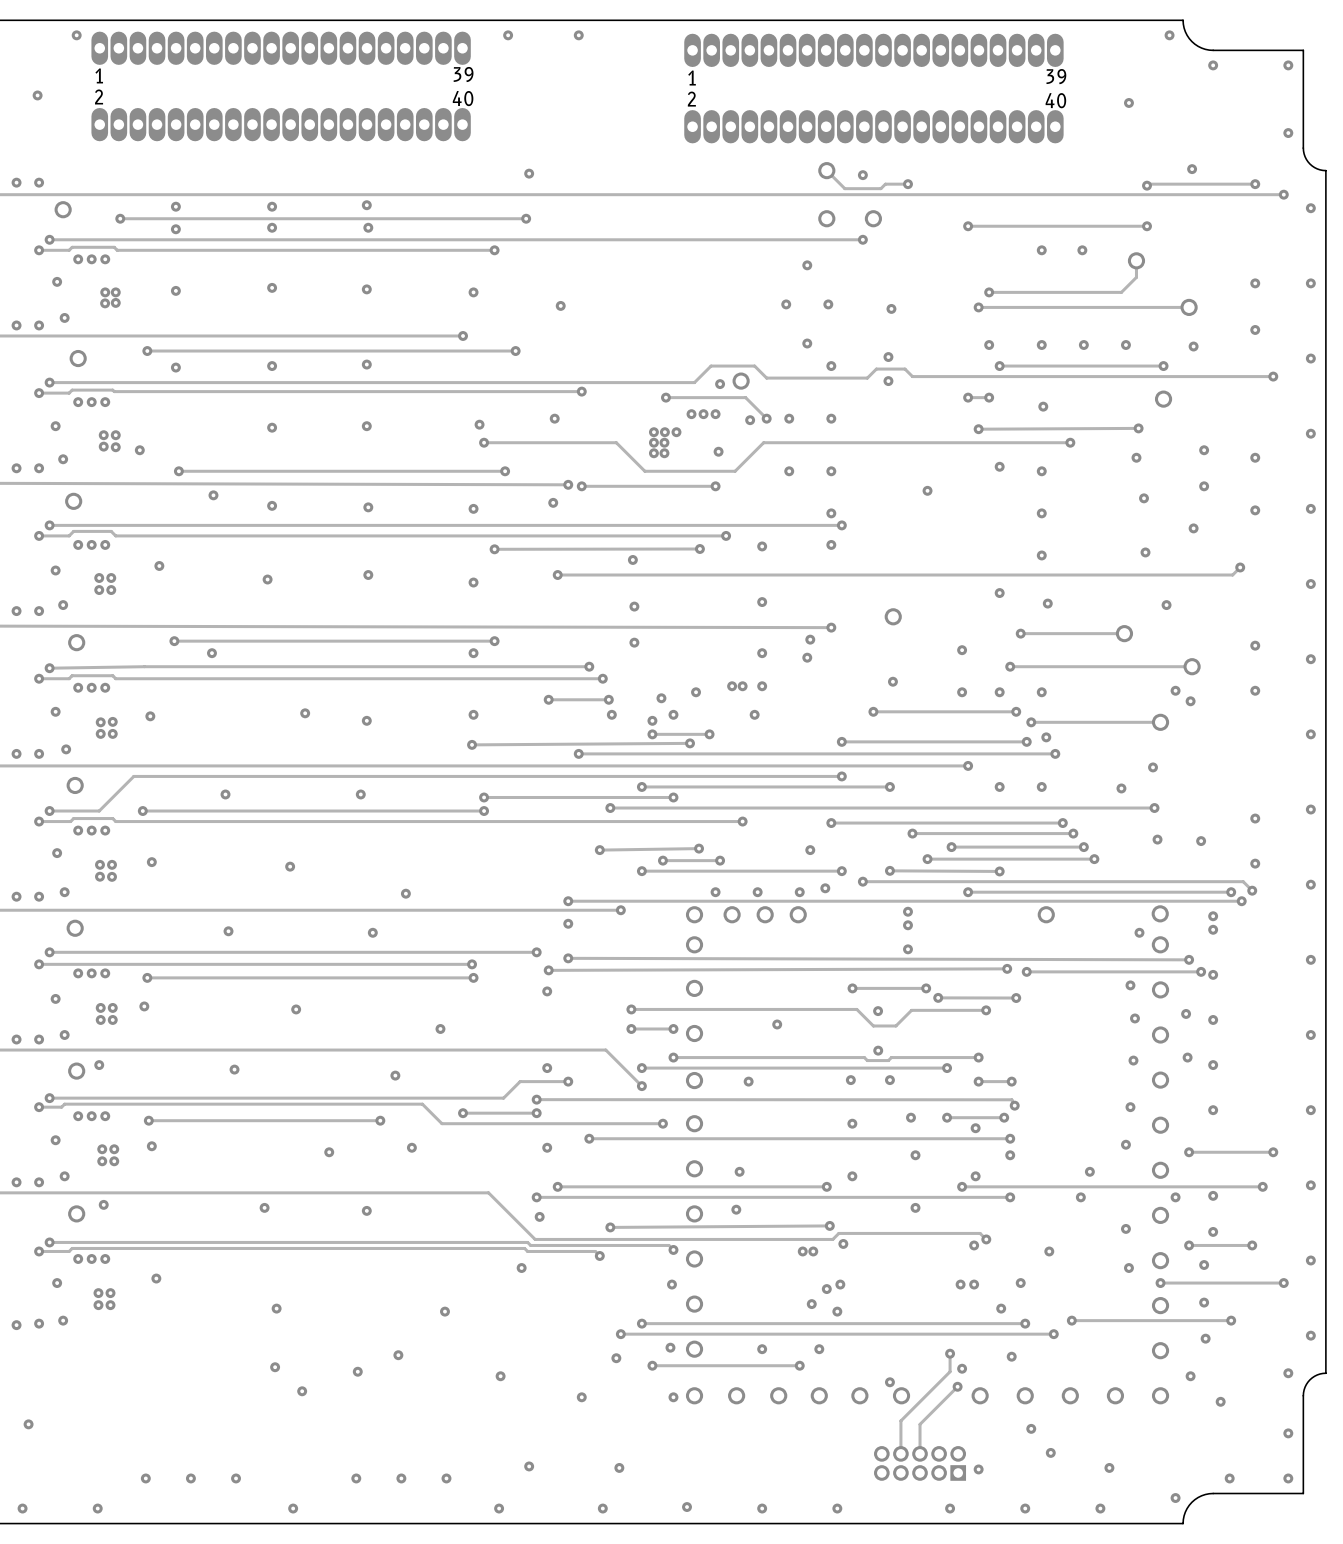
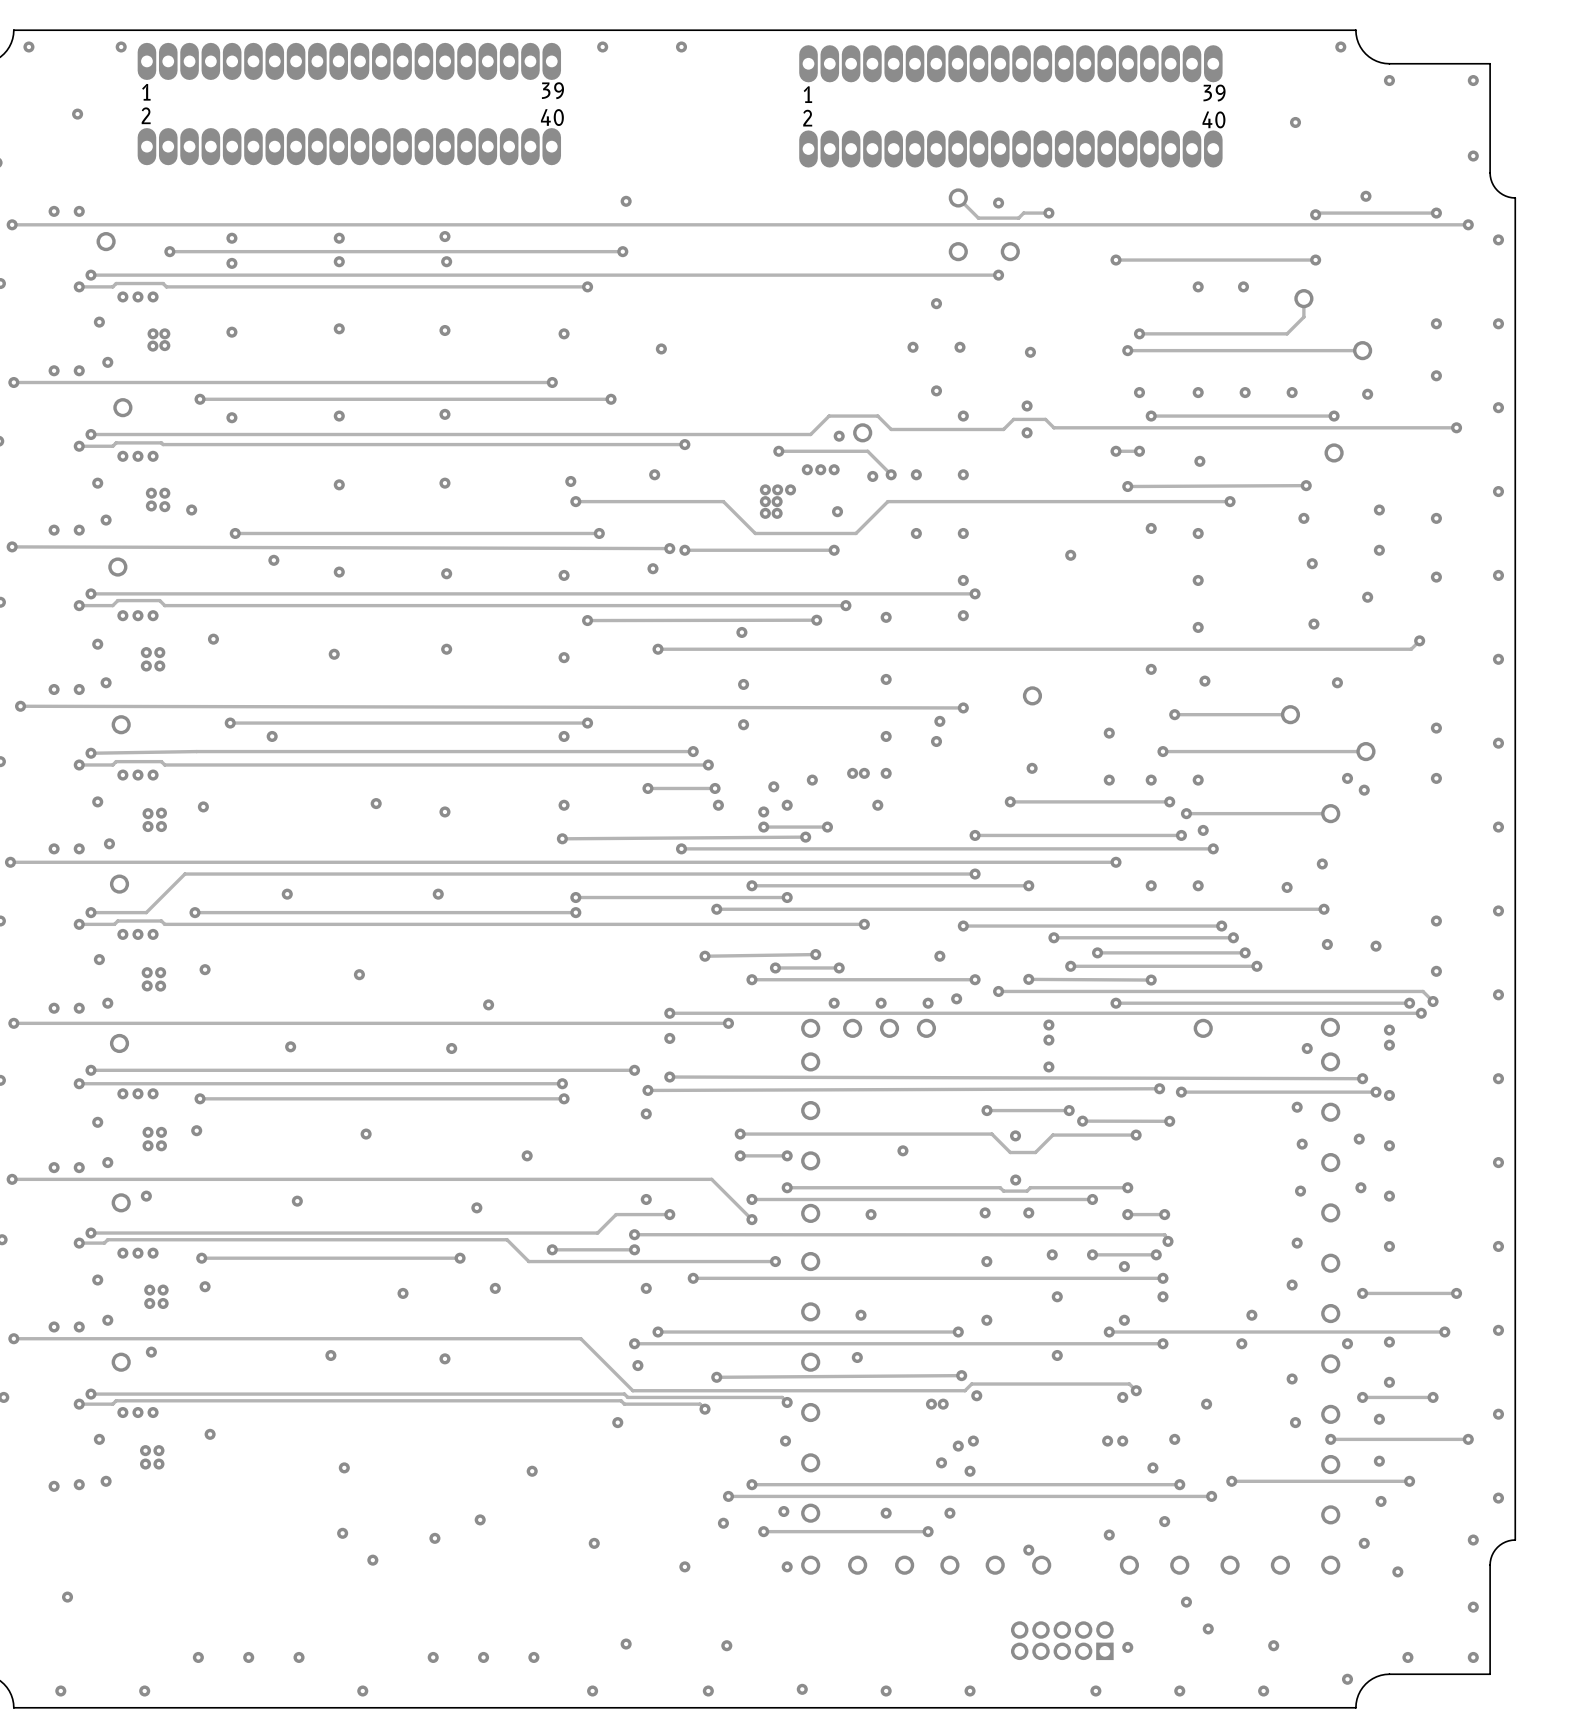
track: (950, 1353) (950, 1371) (900, 1420) (900, 1453) -> none
via: (950, 1353) -> none
track: (957, 1386) (920, 1424) (920, 1453) -> none
via: (957, 1386) -> none

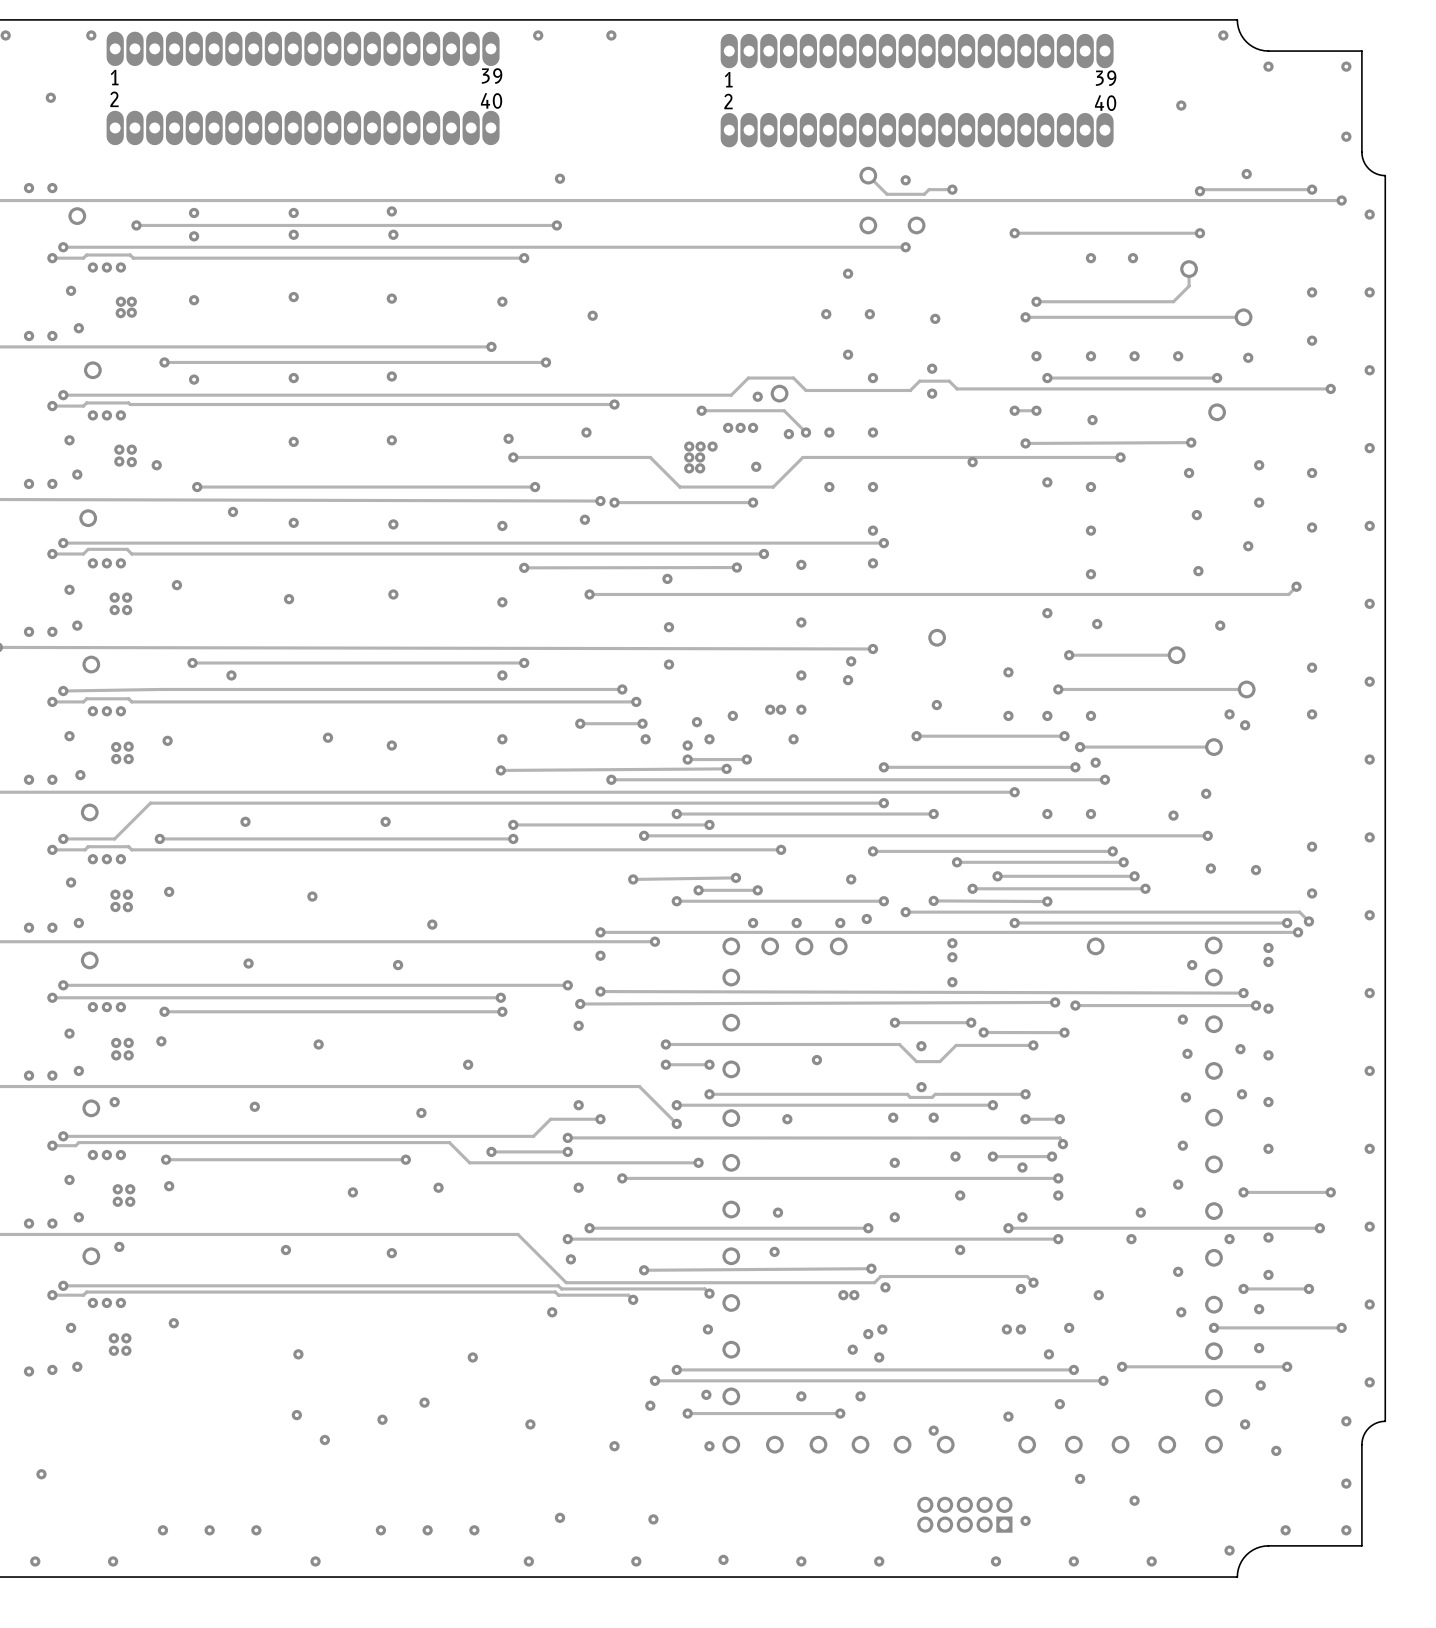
via position: (1070, 555) -> (972, 462)
via: none -> (1134, 1500)
via: (1208, 1628) -> none
via: (1273, 1645) -> none

